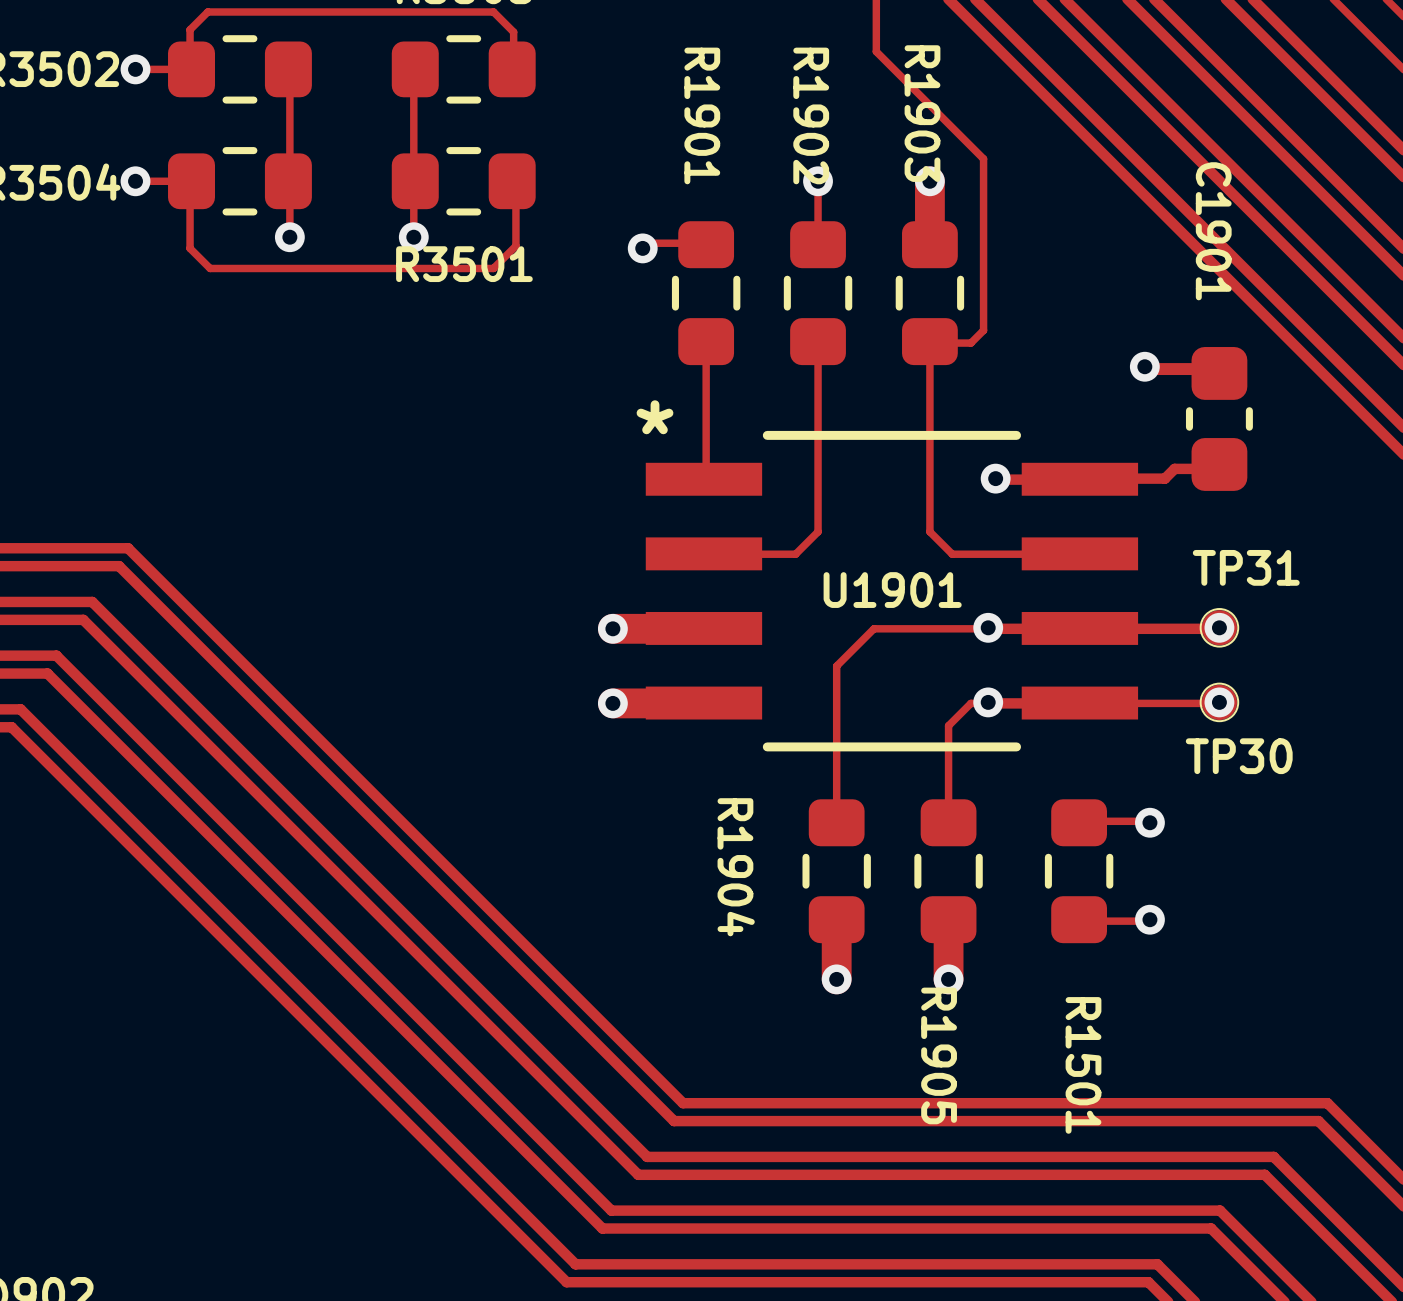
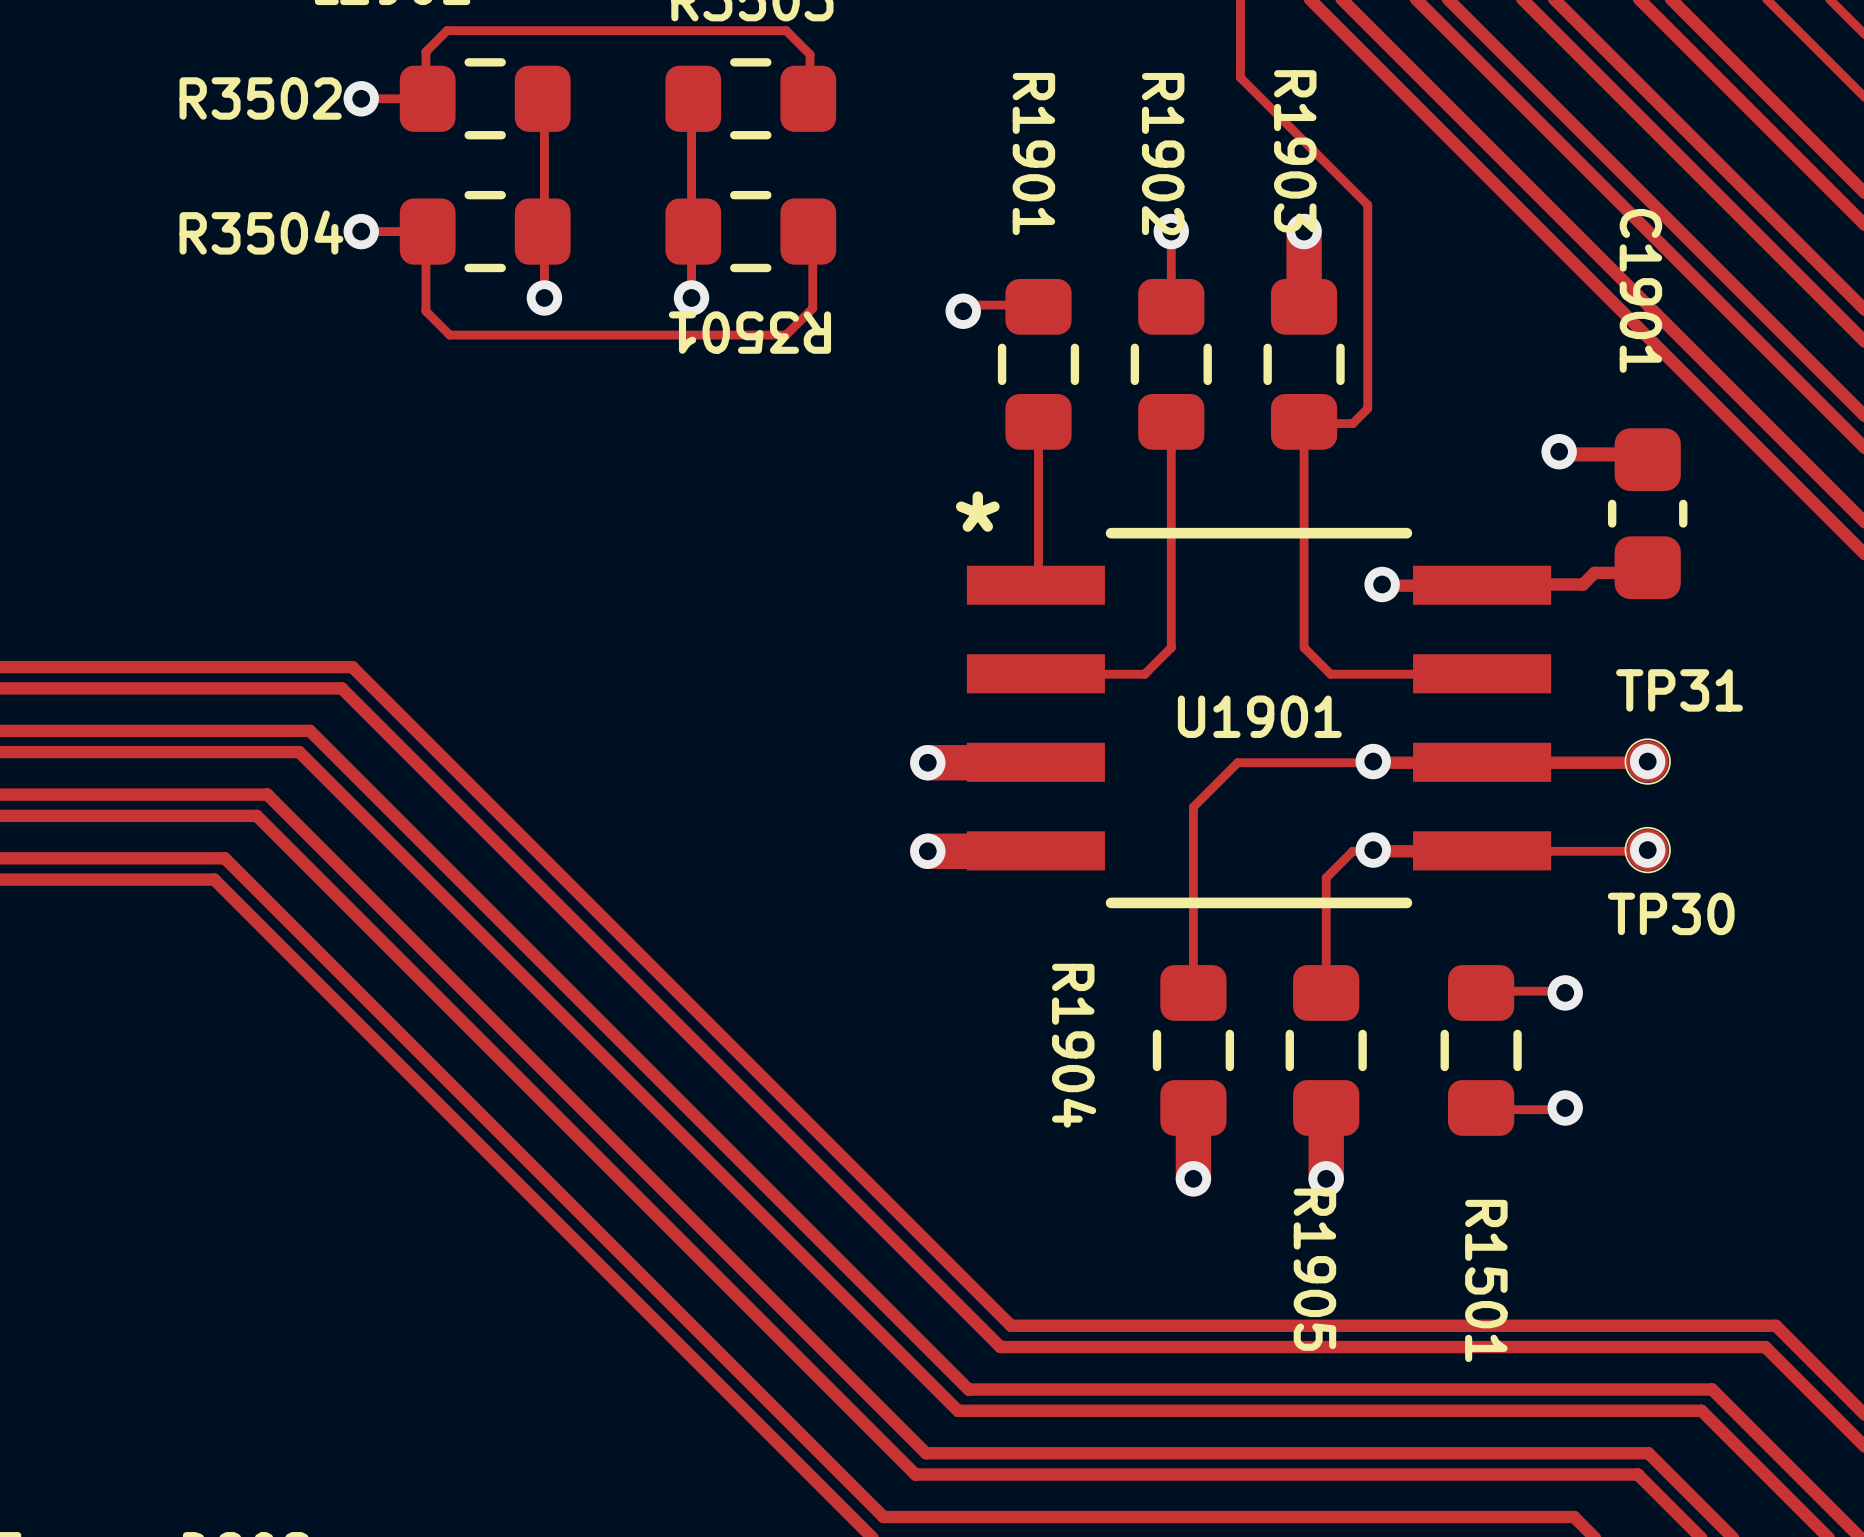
R3501 name rotation: 0° (464, 264) -> 180° (749, 332)

